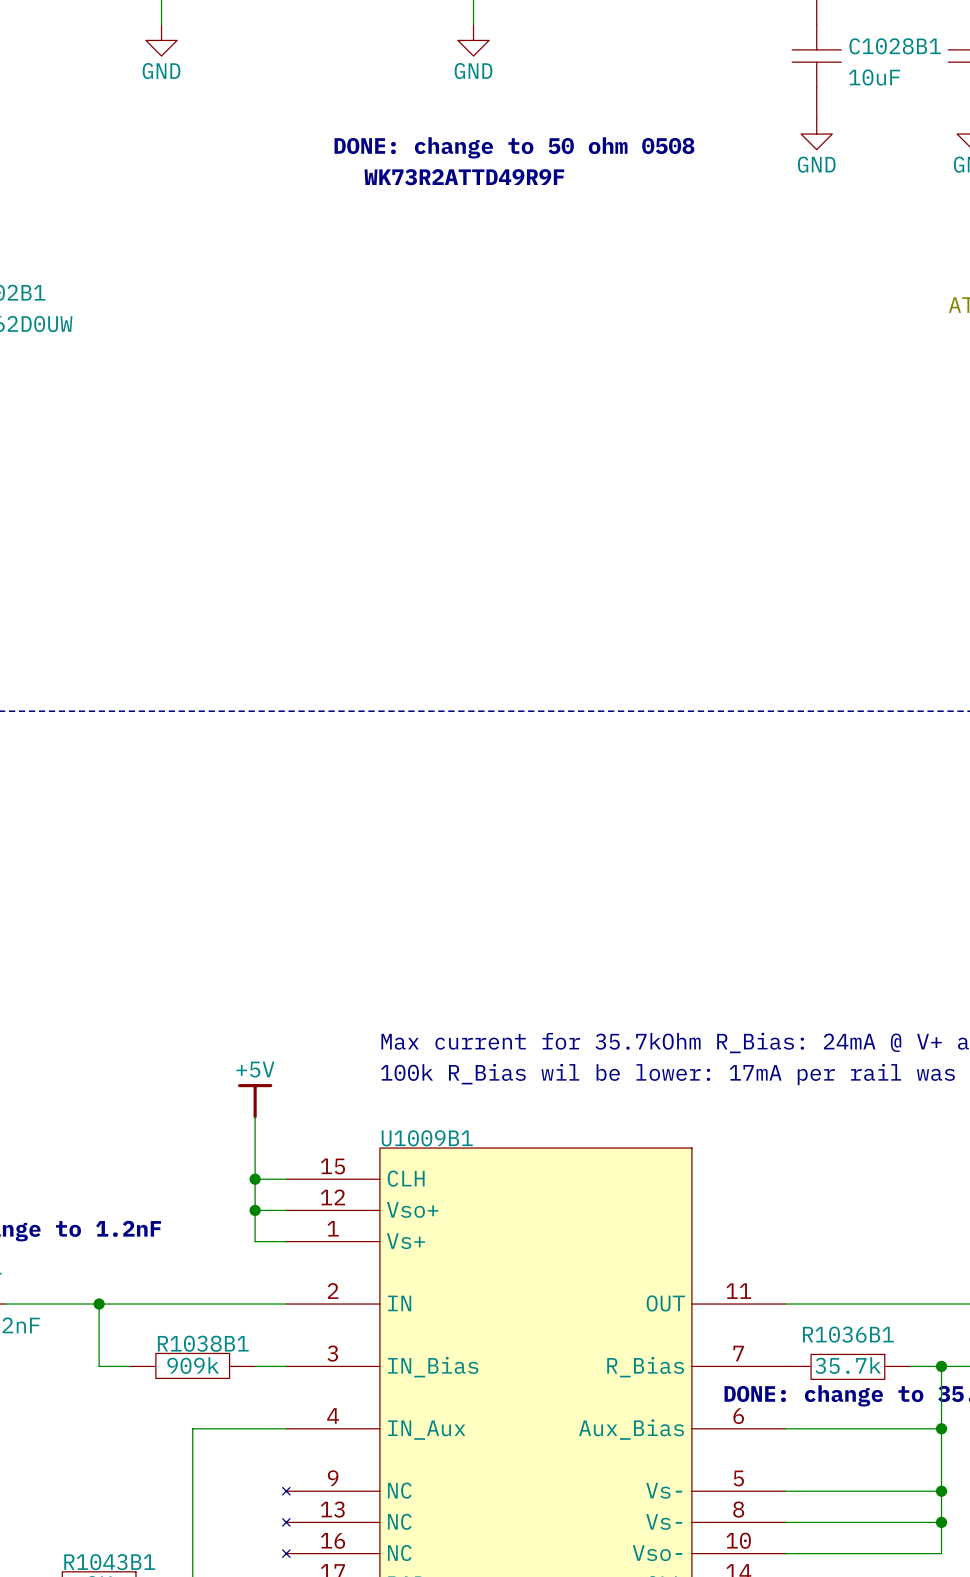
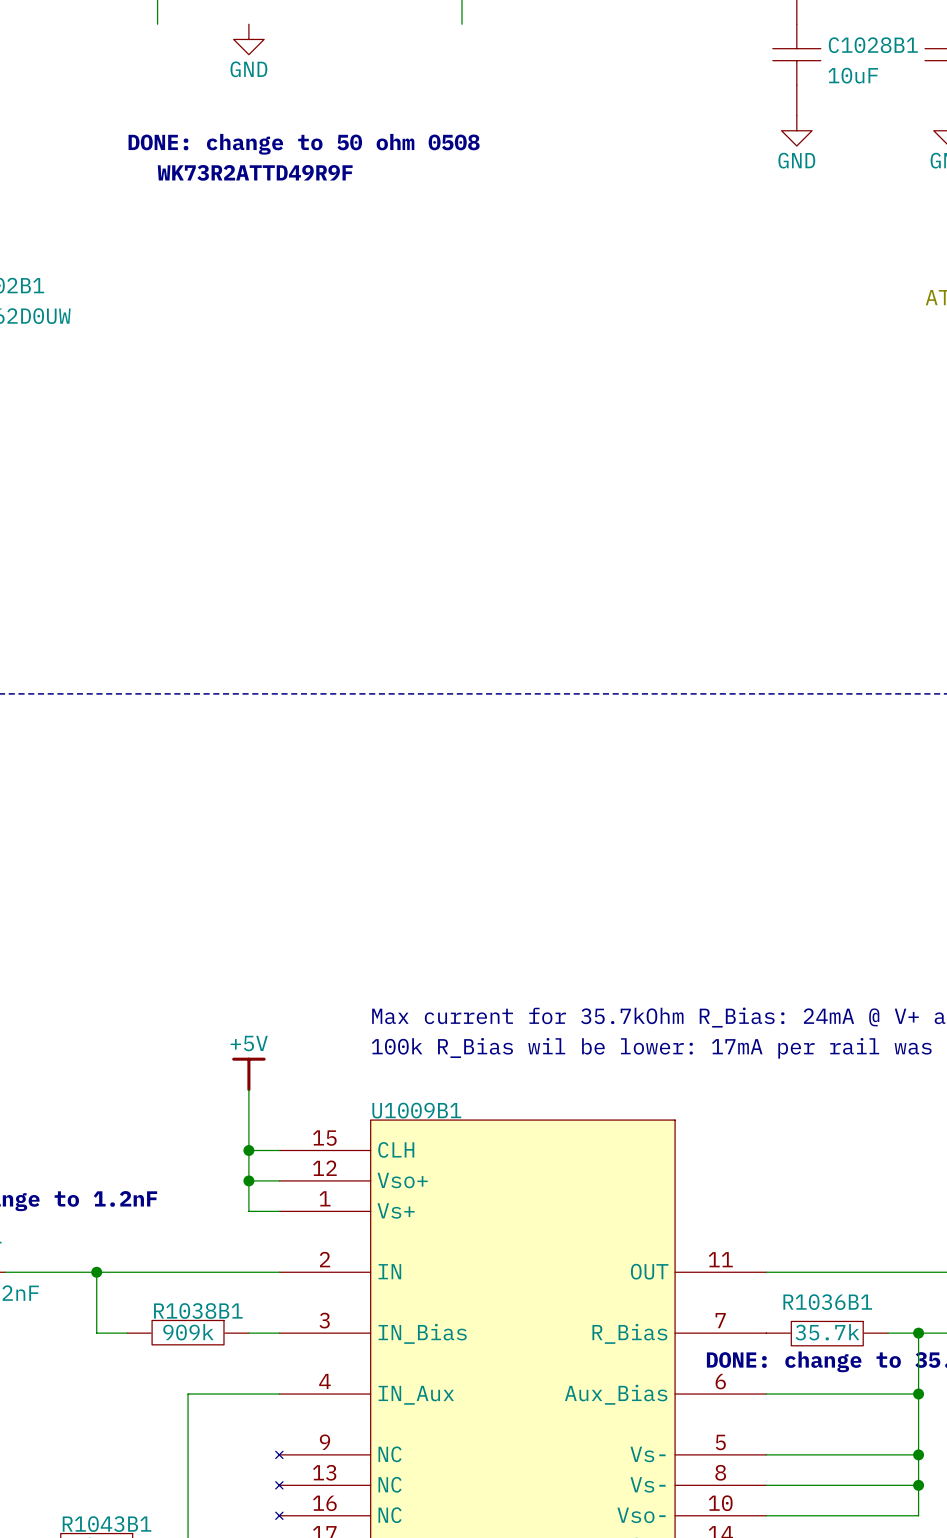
power symbol position: GND (161, 40) -> GND (248, 39)
power symbol: GND (473, 40) -> none
text position: DONE: change to 50 ohm 0508 (514, 147) -> DONE: change to 50 ohm 0508 (304, 144)
text position: WK73R2ATTD49R9F (464, 177) -> WK73R2ATTD49R9F (255, 172)

